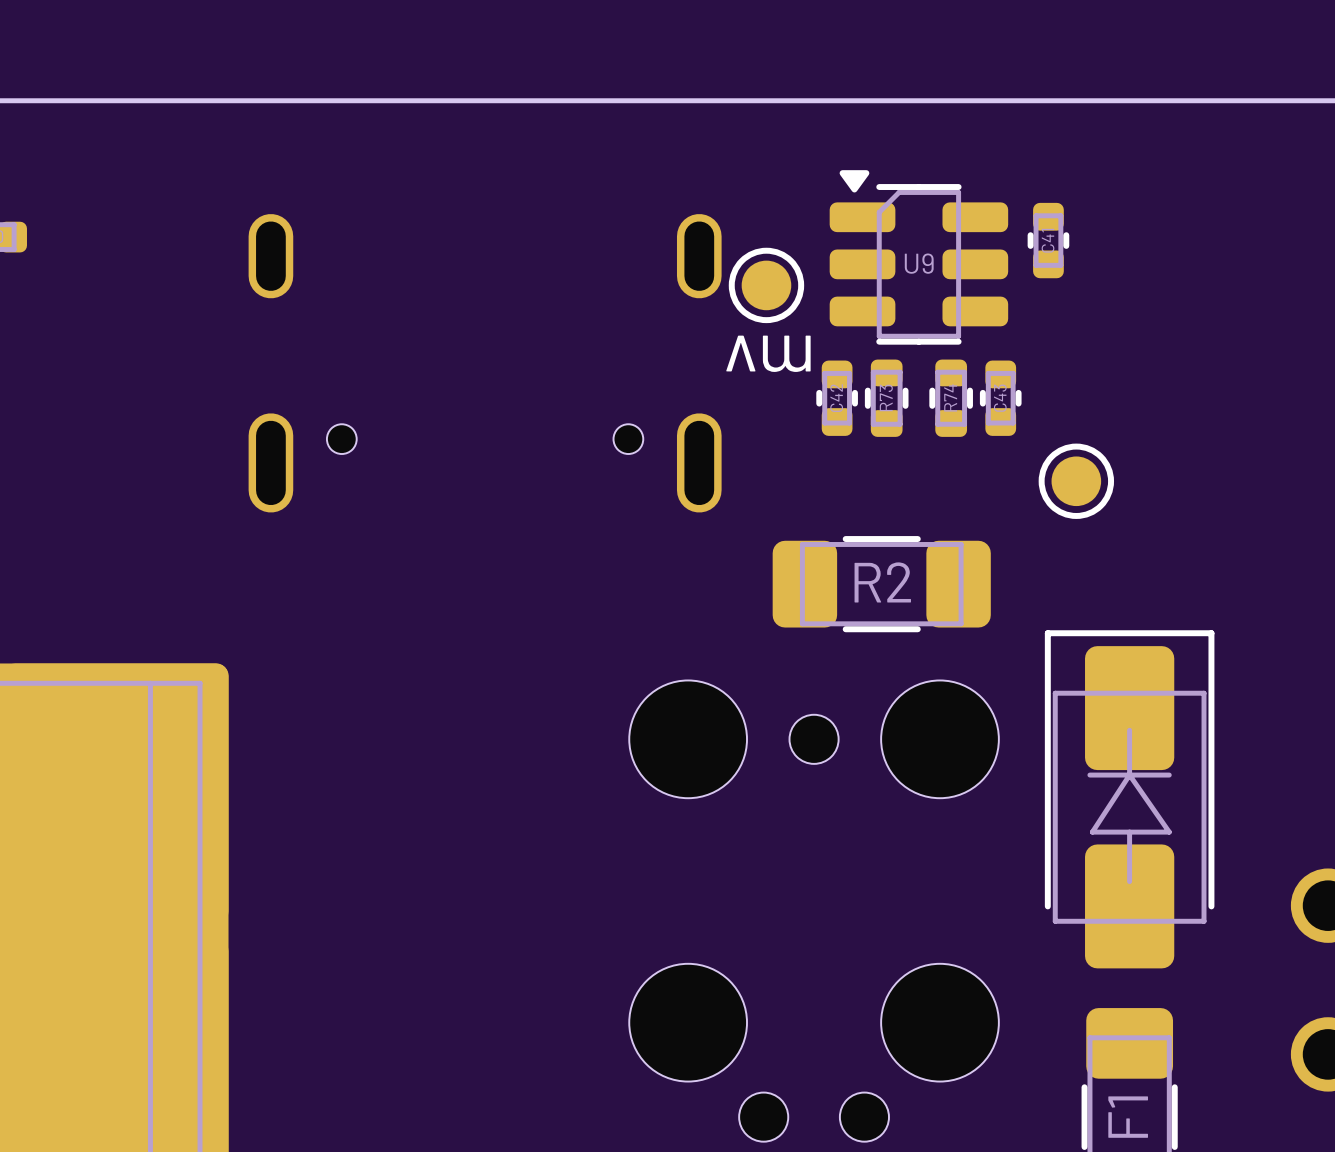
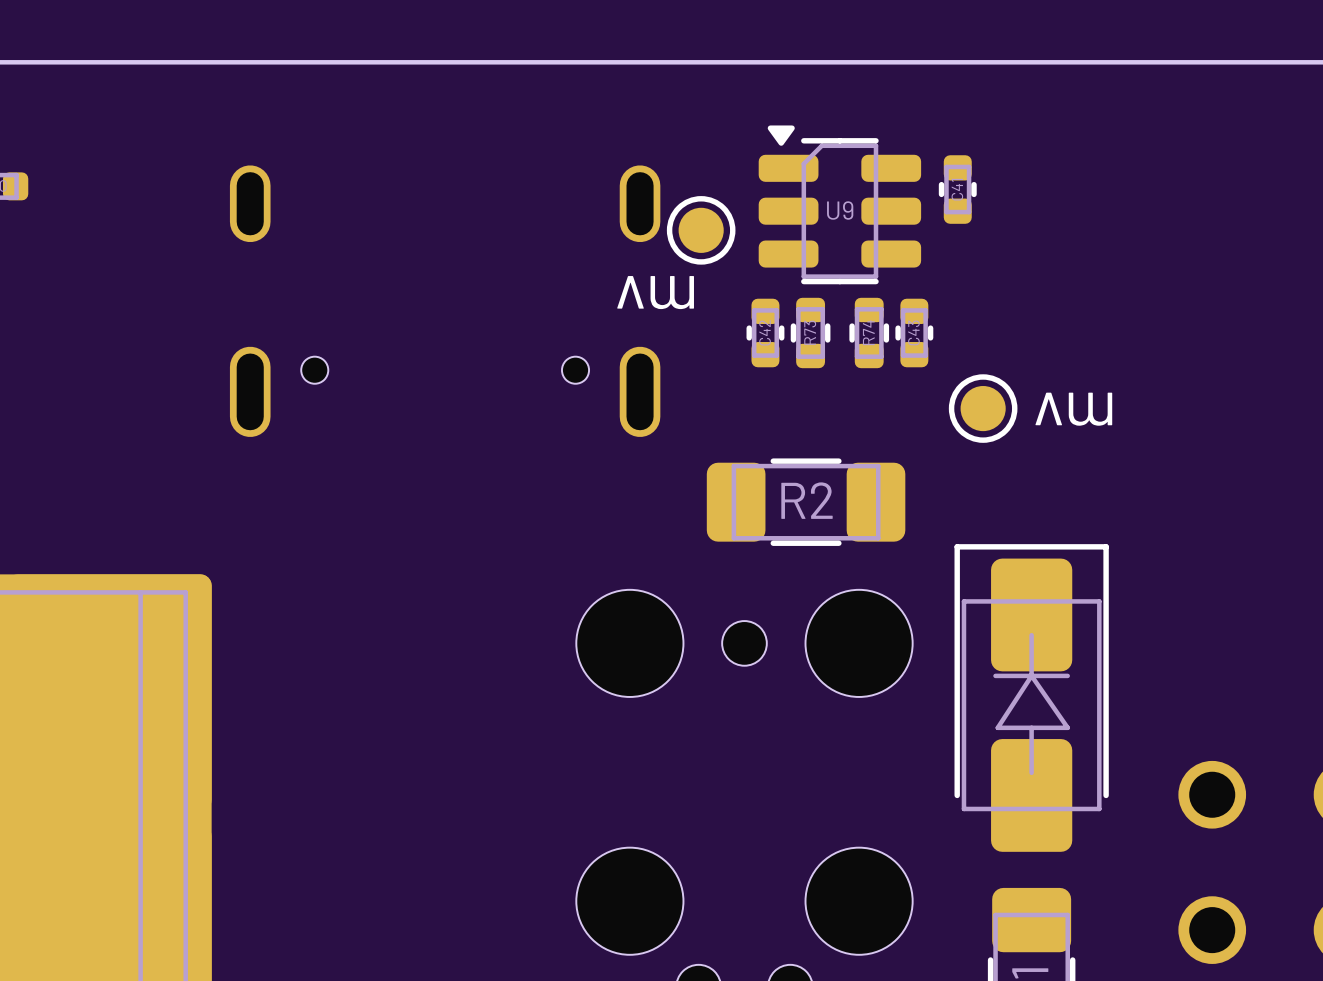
part text position: mv (768, 353) -> mv (655, 292)
text: none -> mv (1073, 409)

